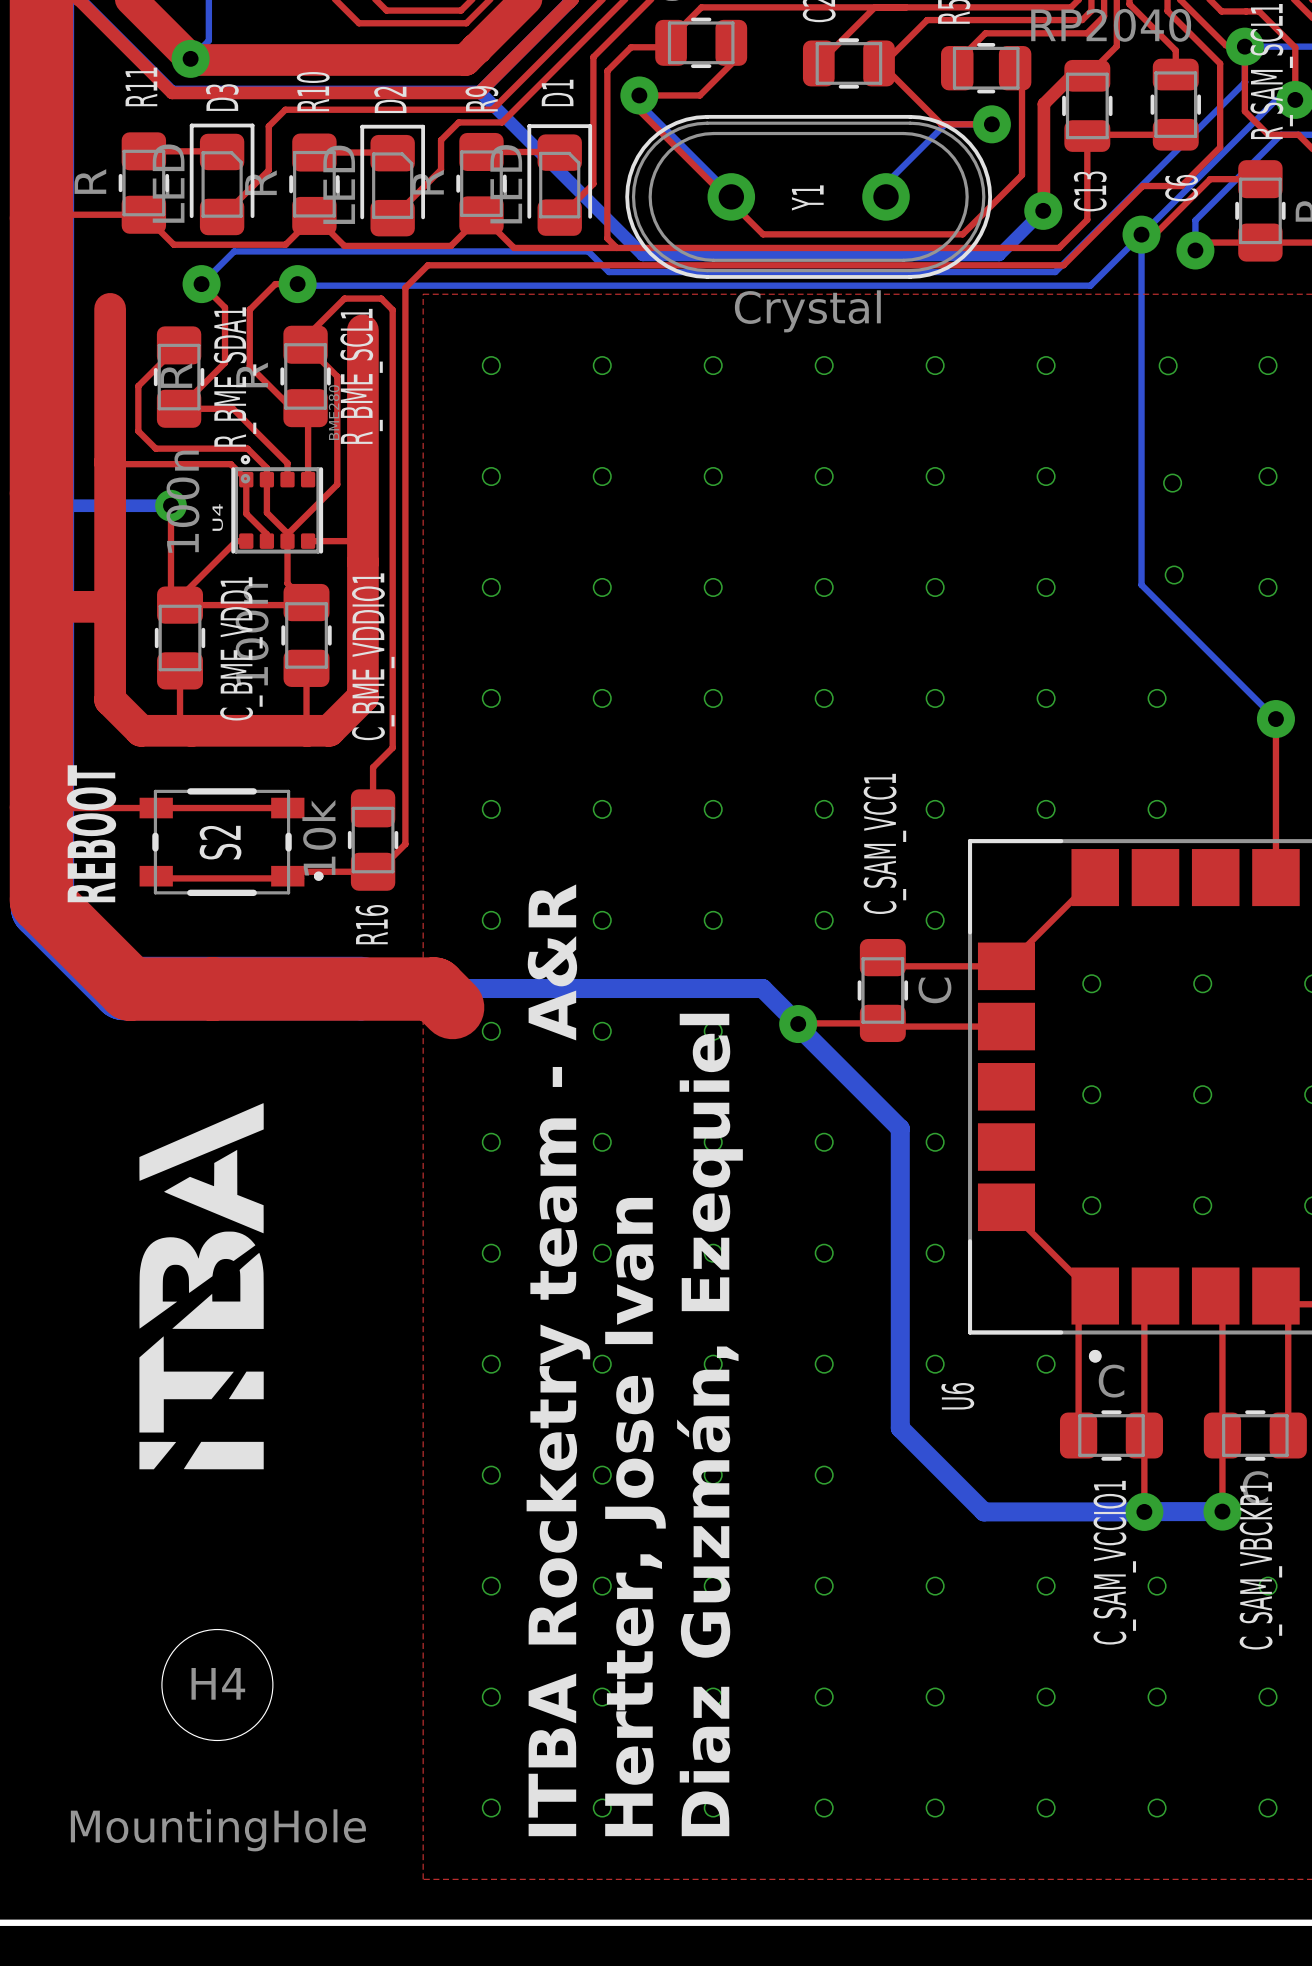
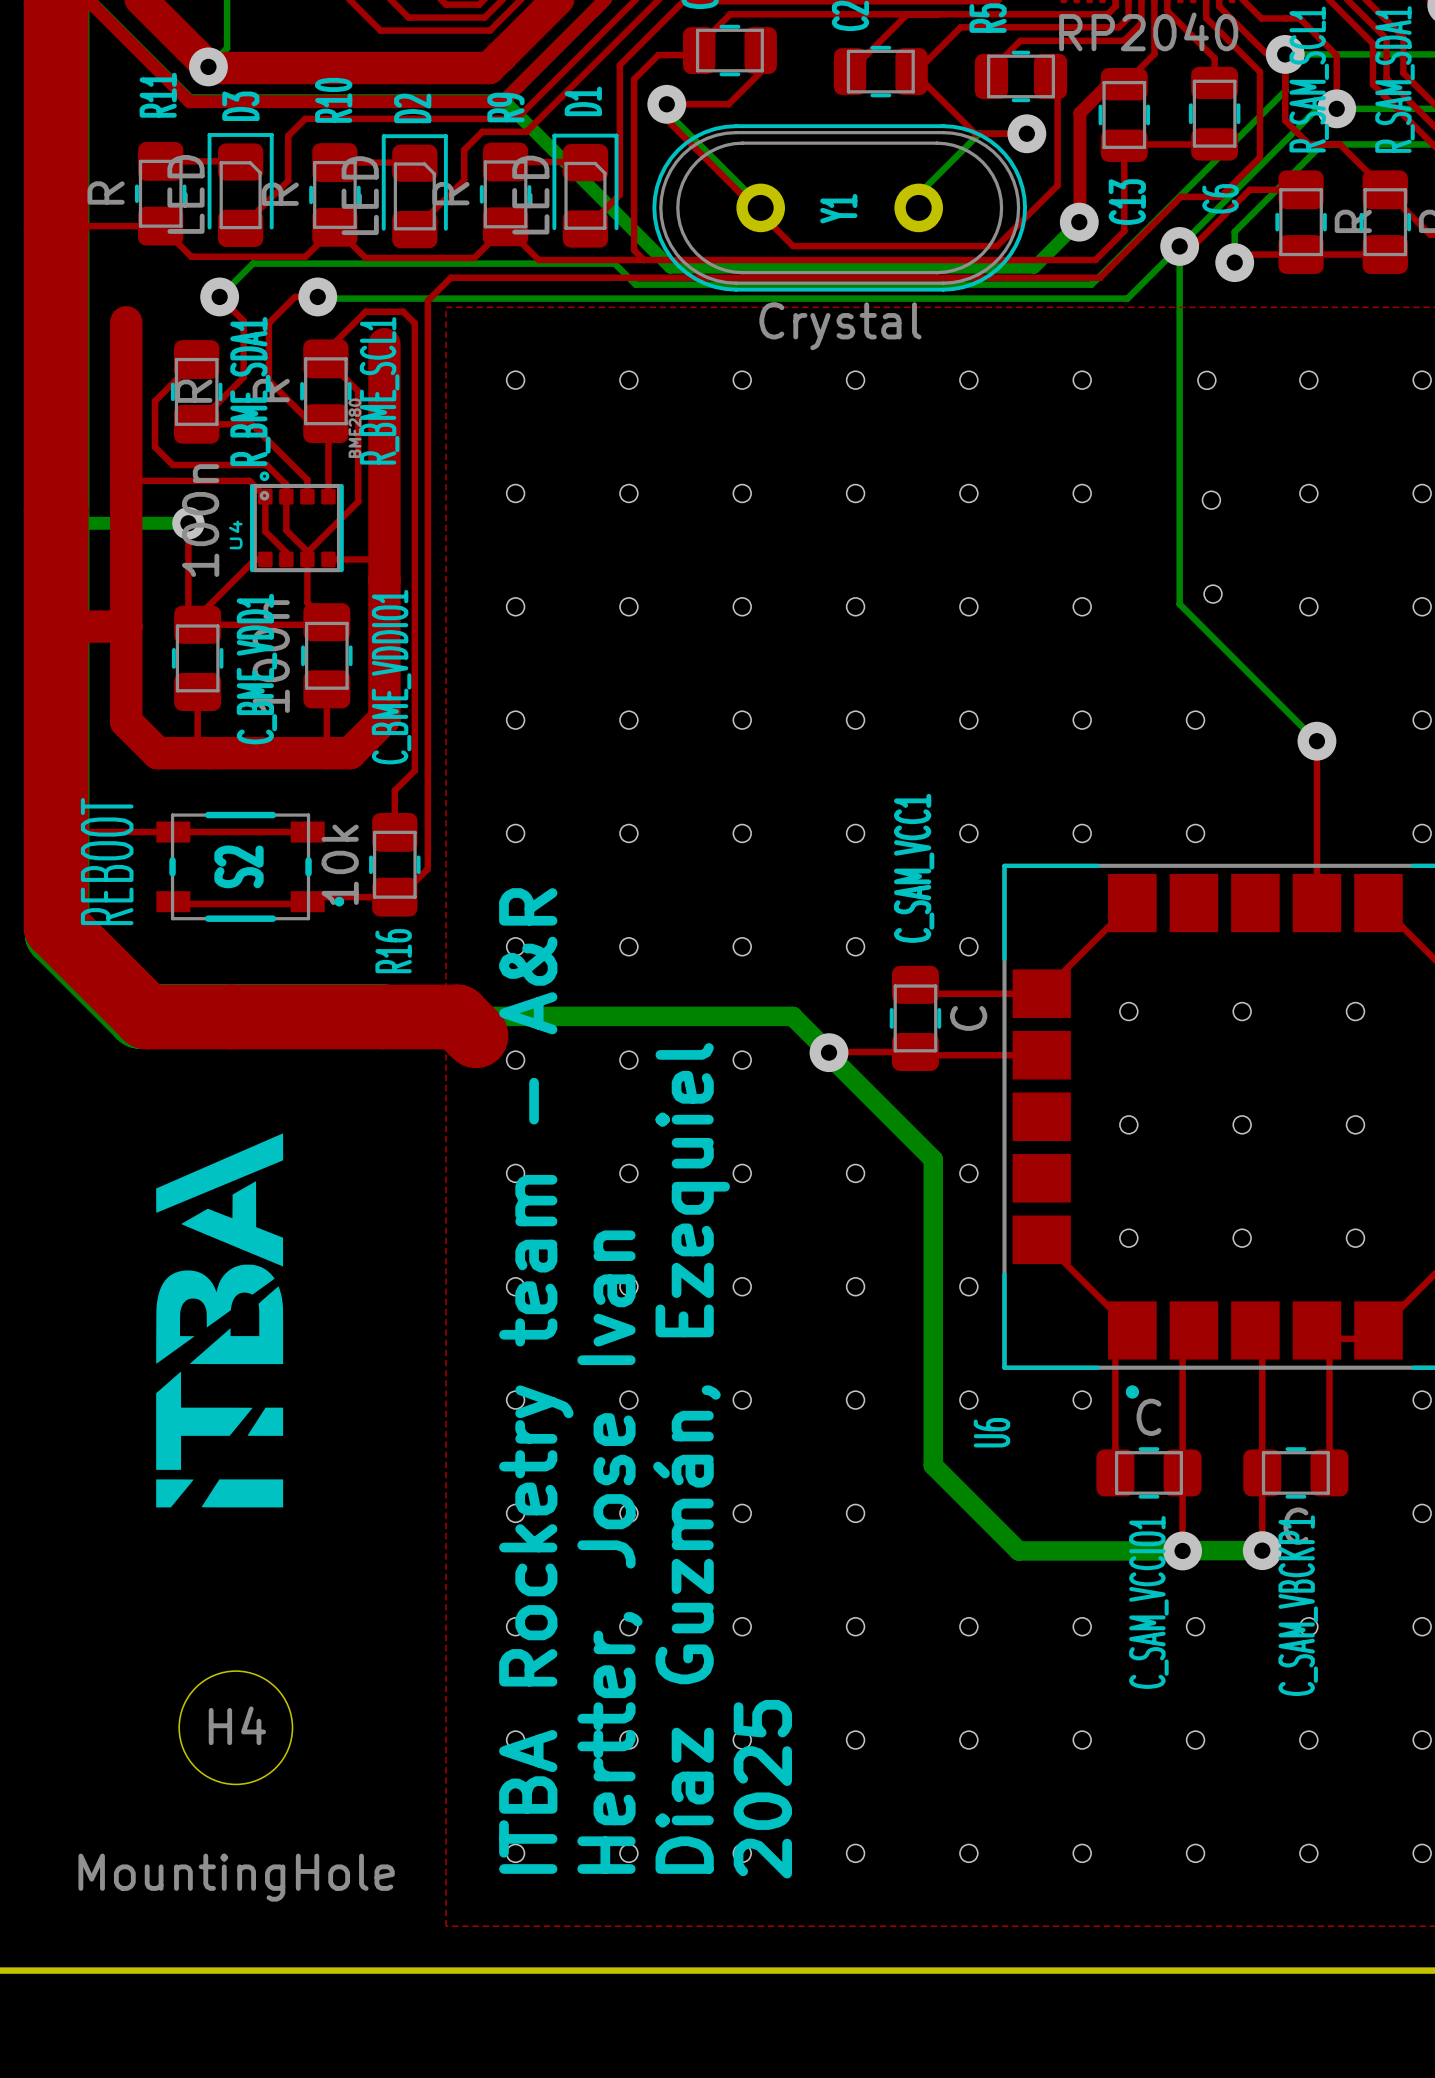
text position: ITBA Rocketry team - A&R (558, 1360) -> ITBA Rocketry team - A&R (536, 1381)
text position: Diaz Guzmán, Ezequiel (709, 1424) -> Diaz Guzmán, Ezequiel (691, 1458)
text position: Hertter, Jose Ivan (635, 1517) -> Hertter, Jose Ivan (609, 1552)
text: none -> 2025 (762, 1789)

